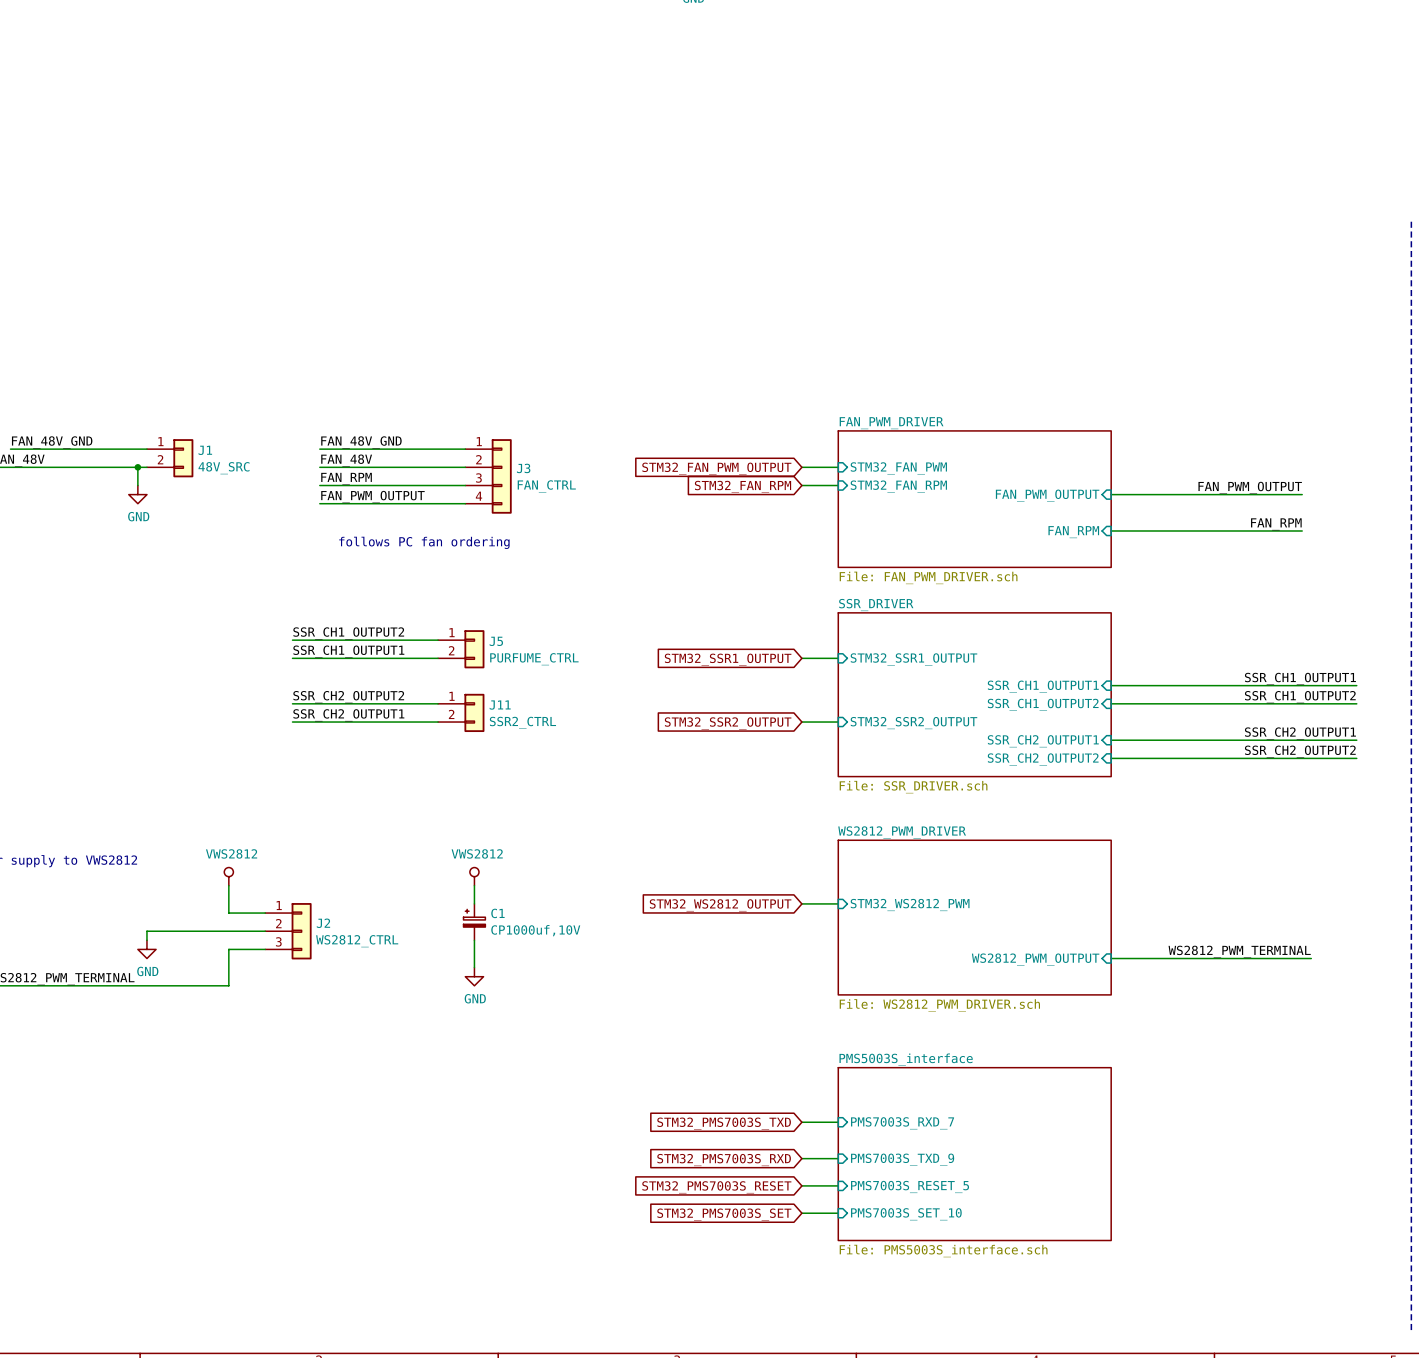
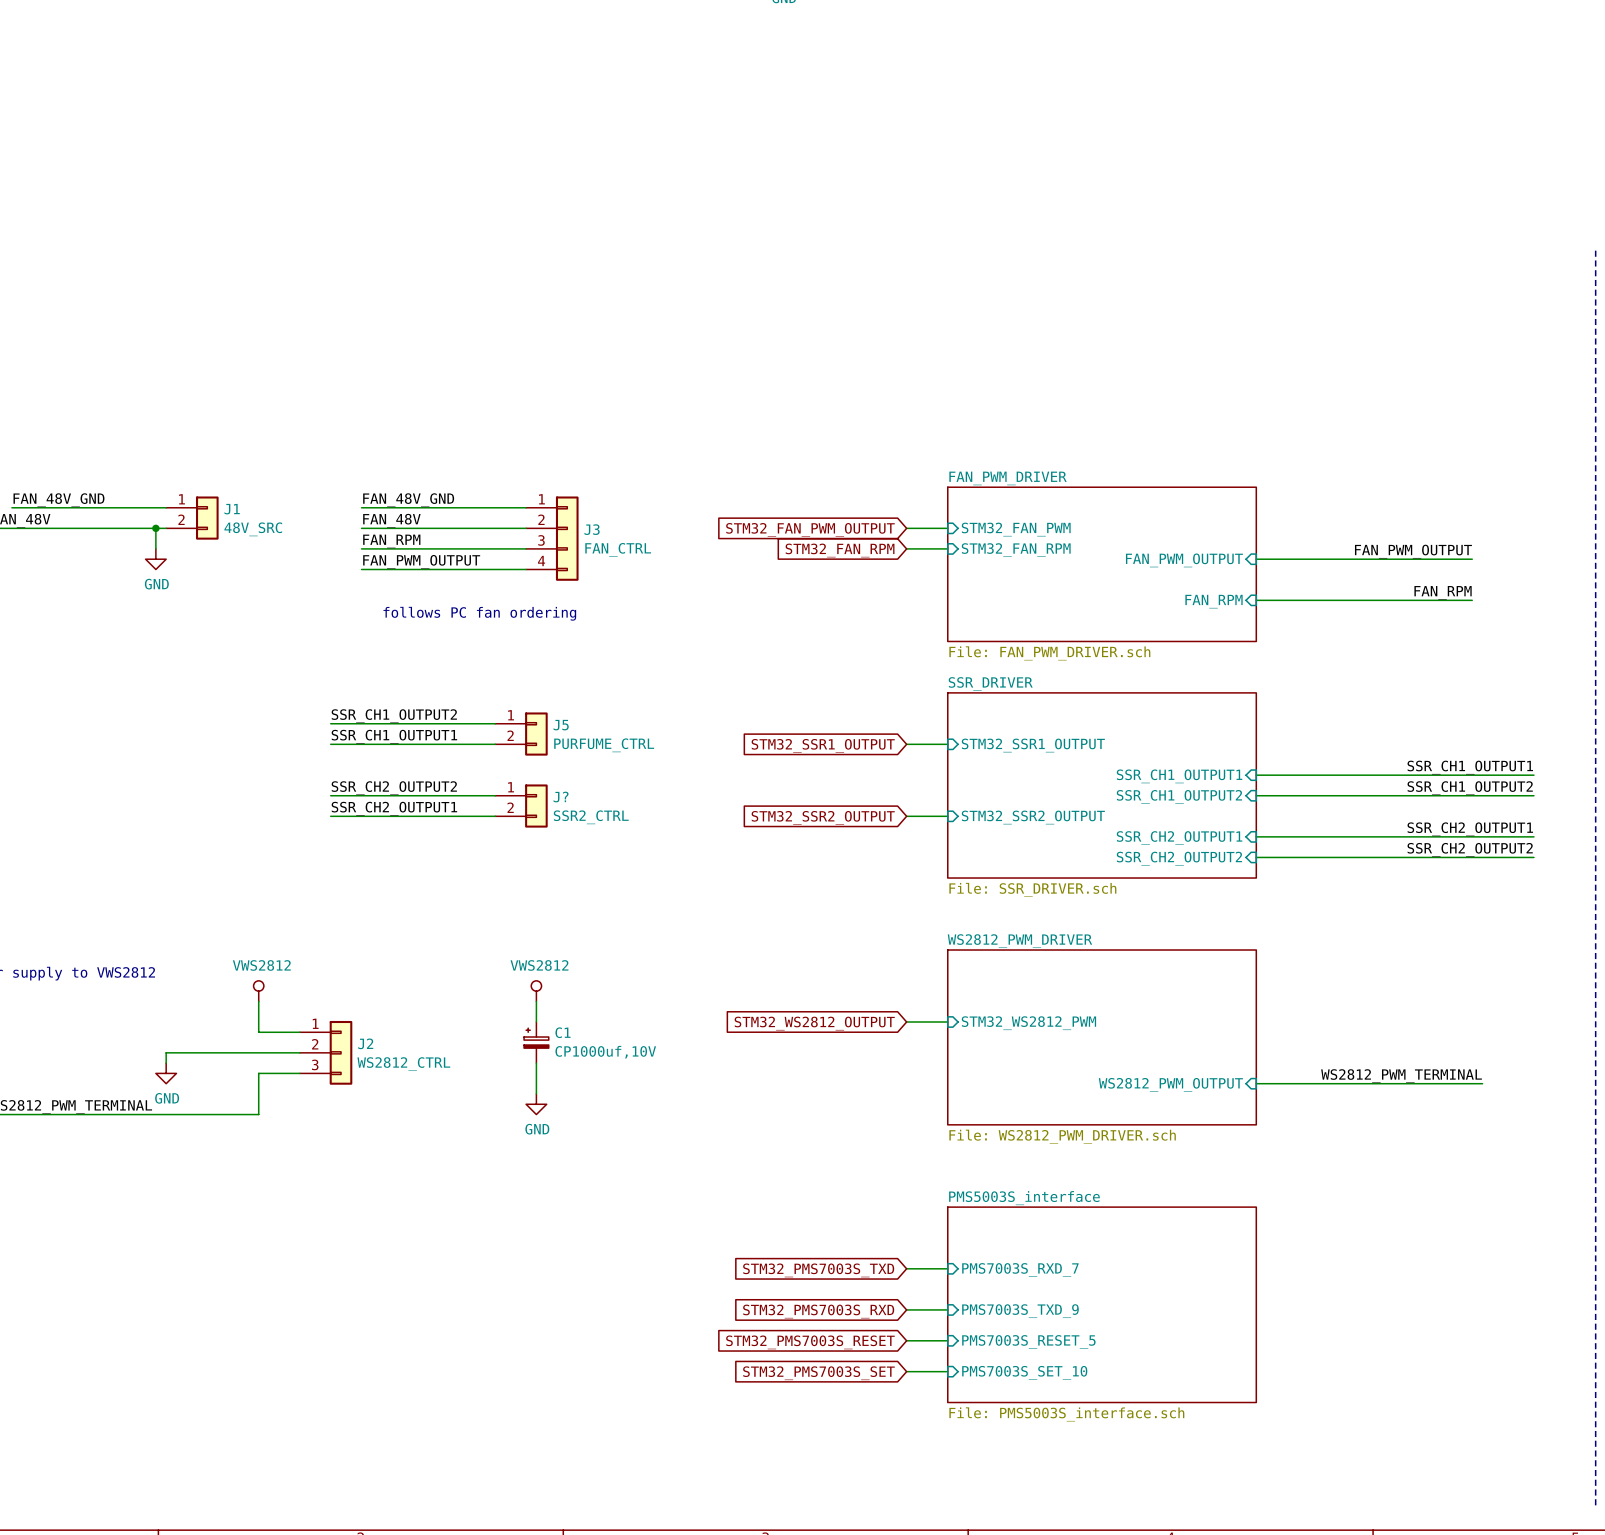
J11 name: J11 (500, 705) -> J? (561, 797)

